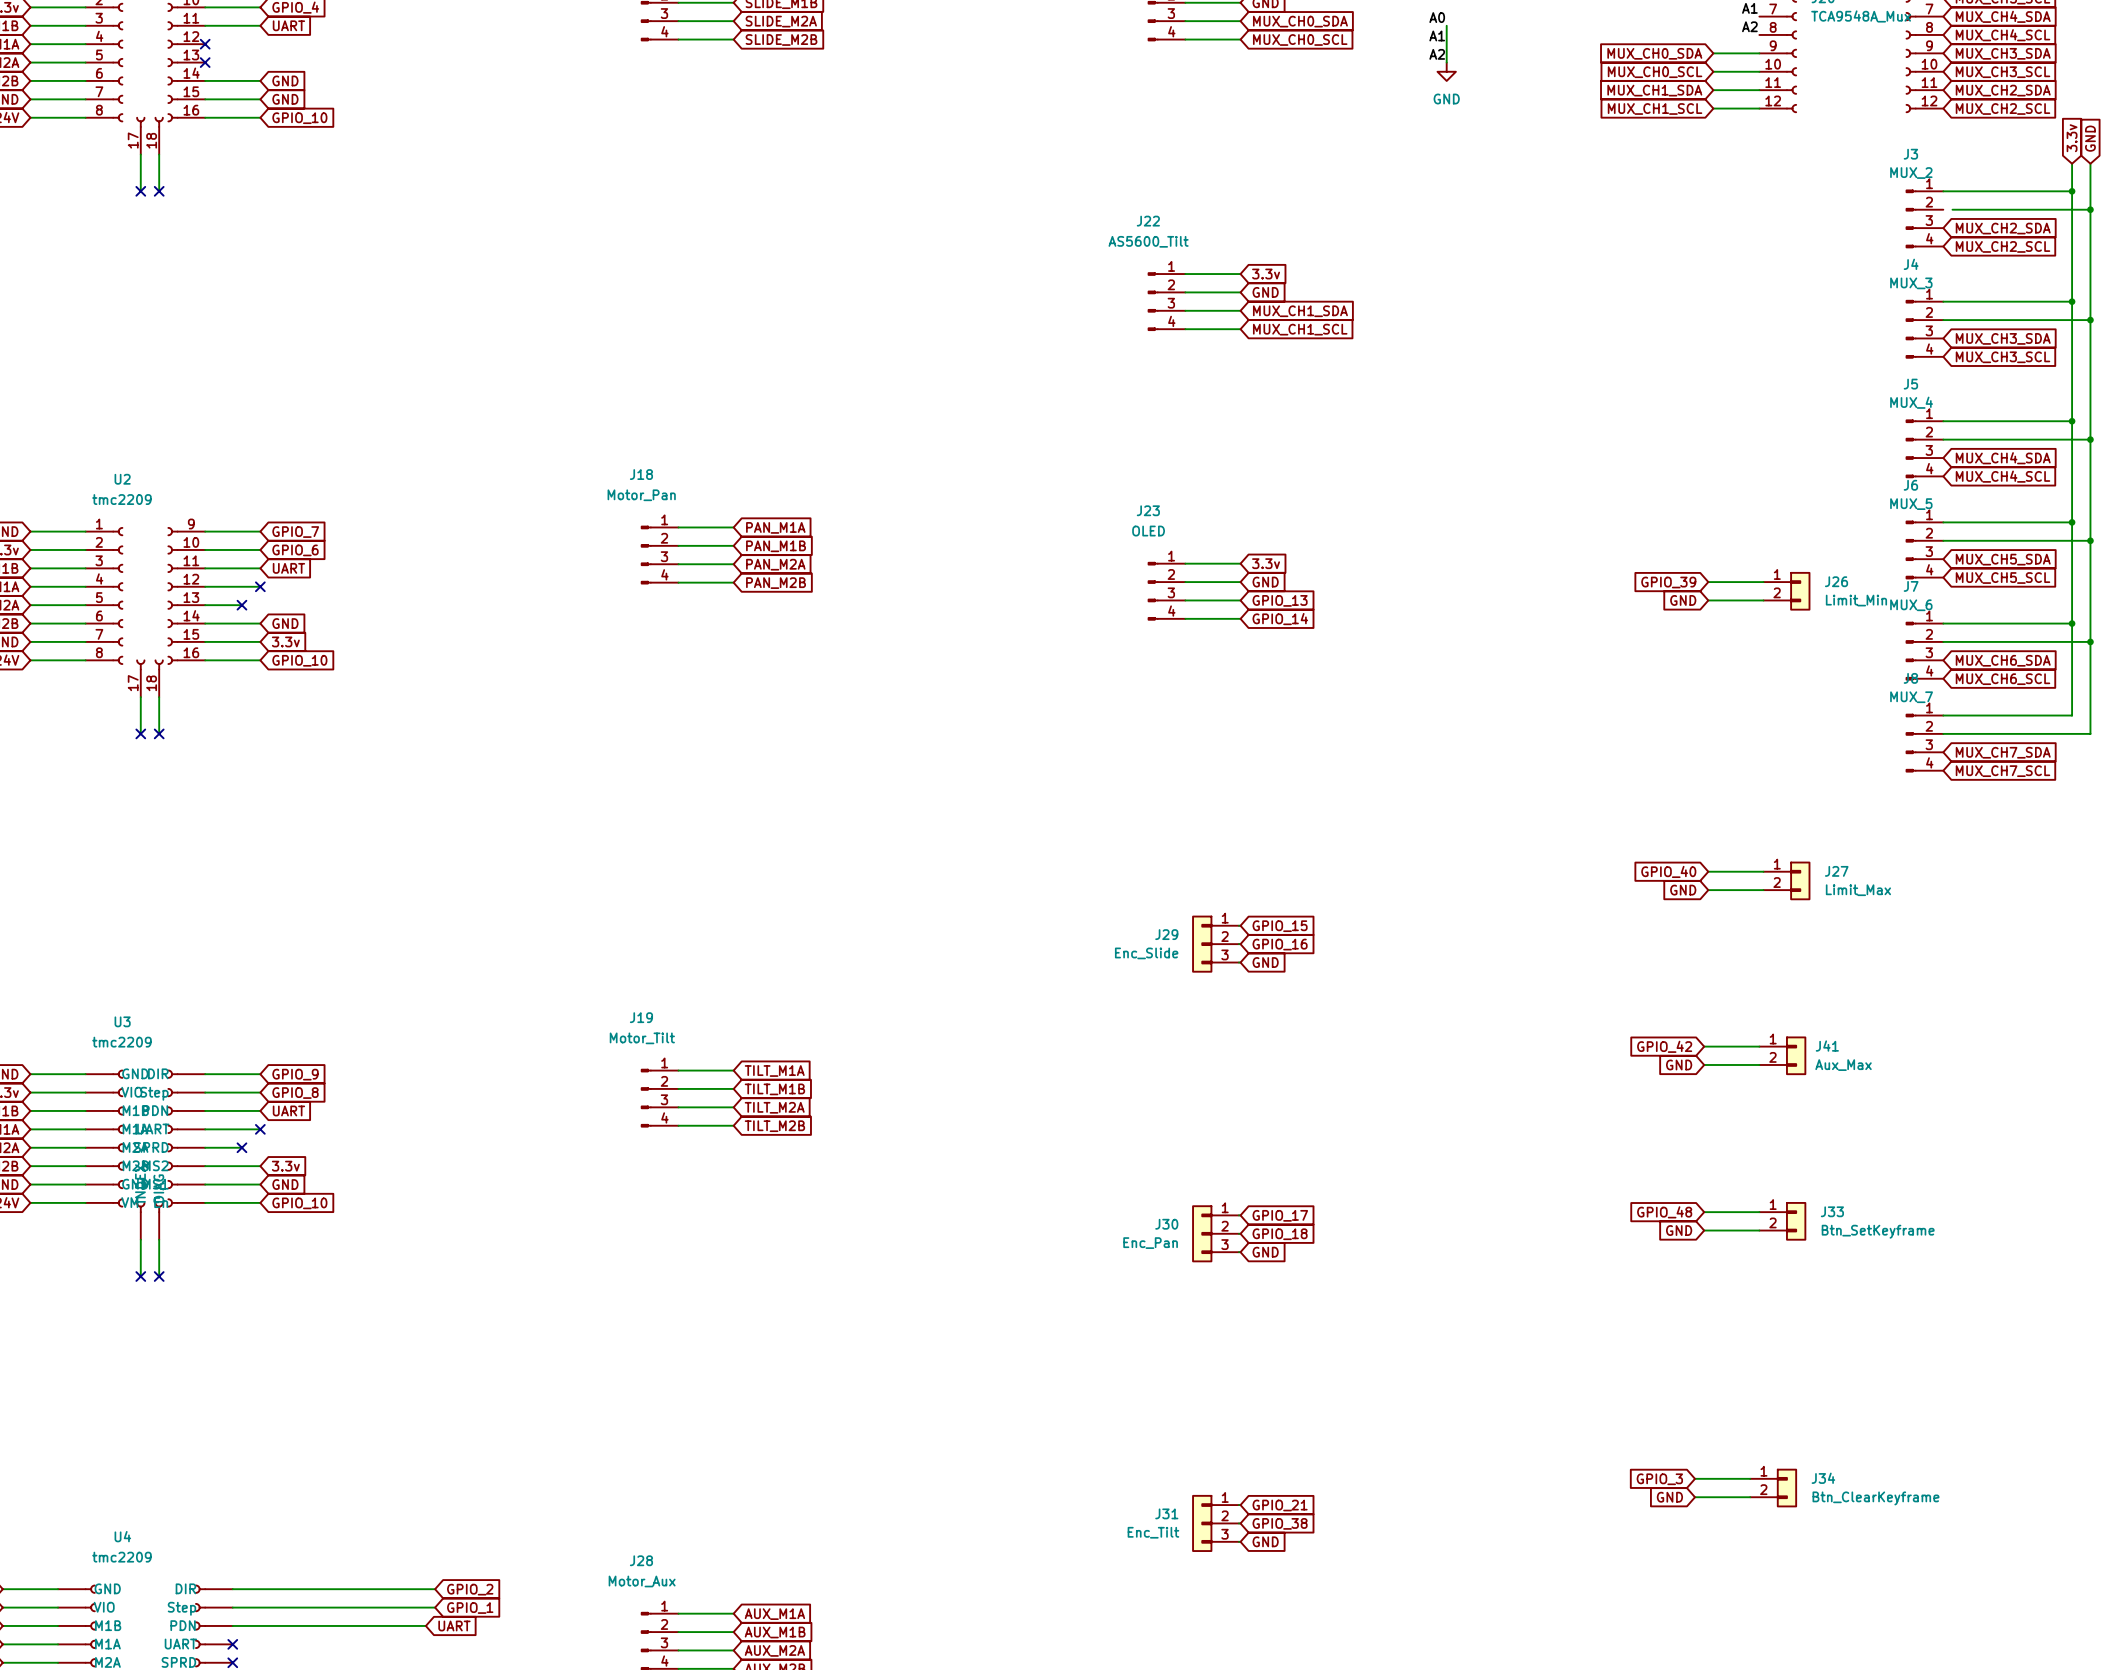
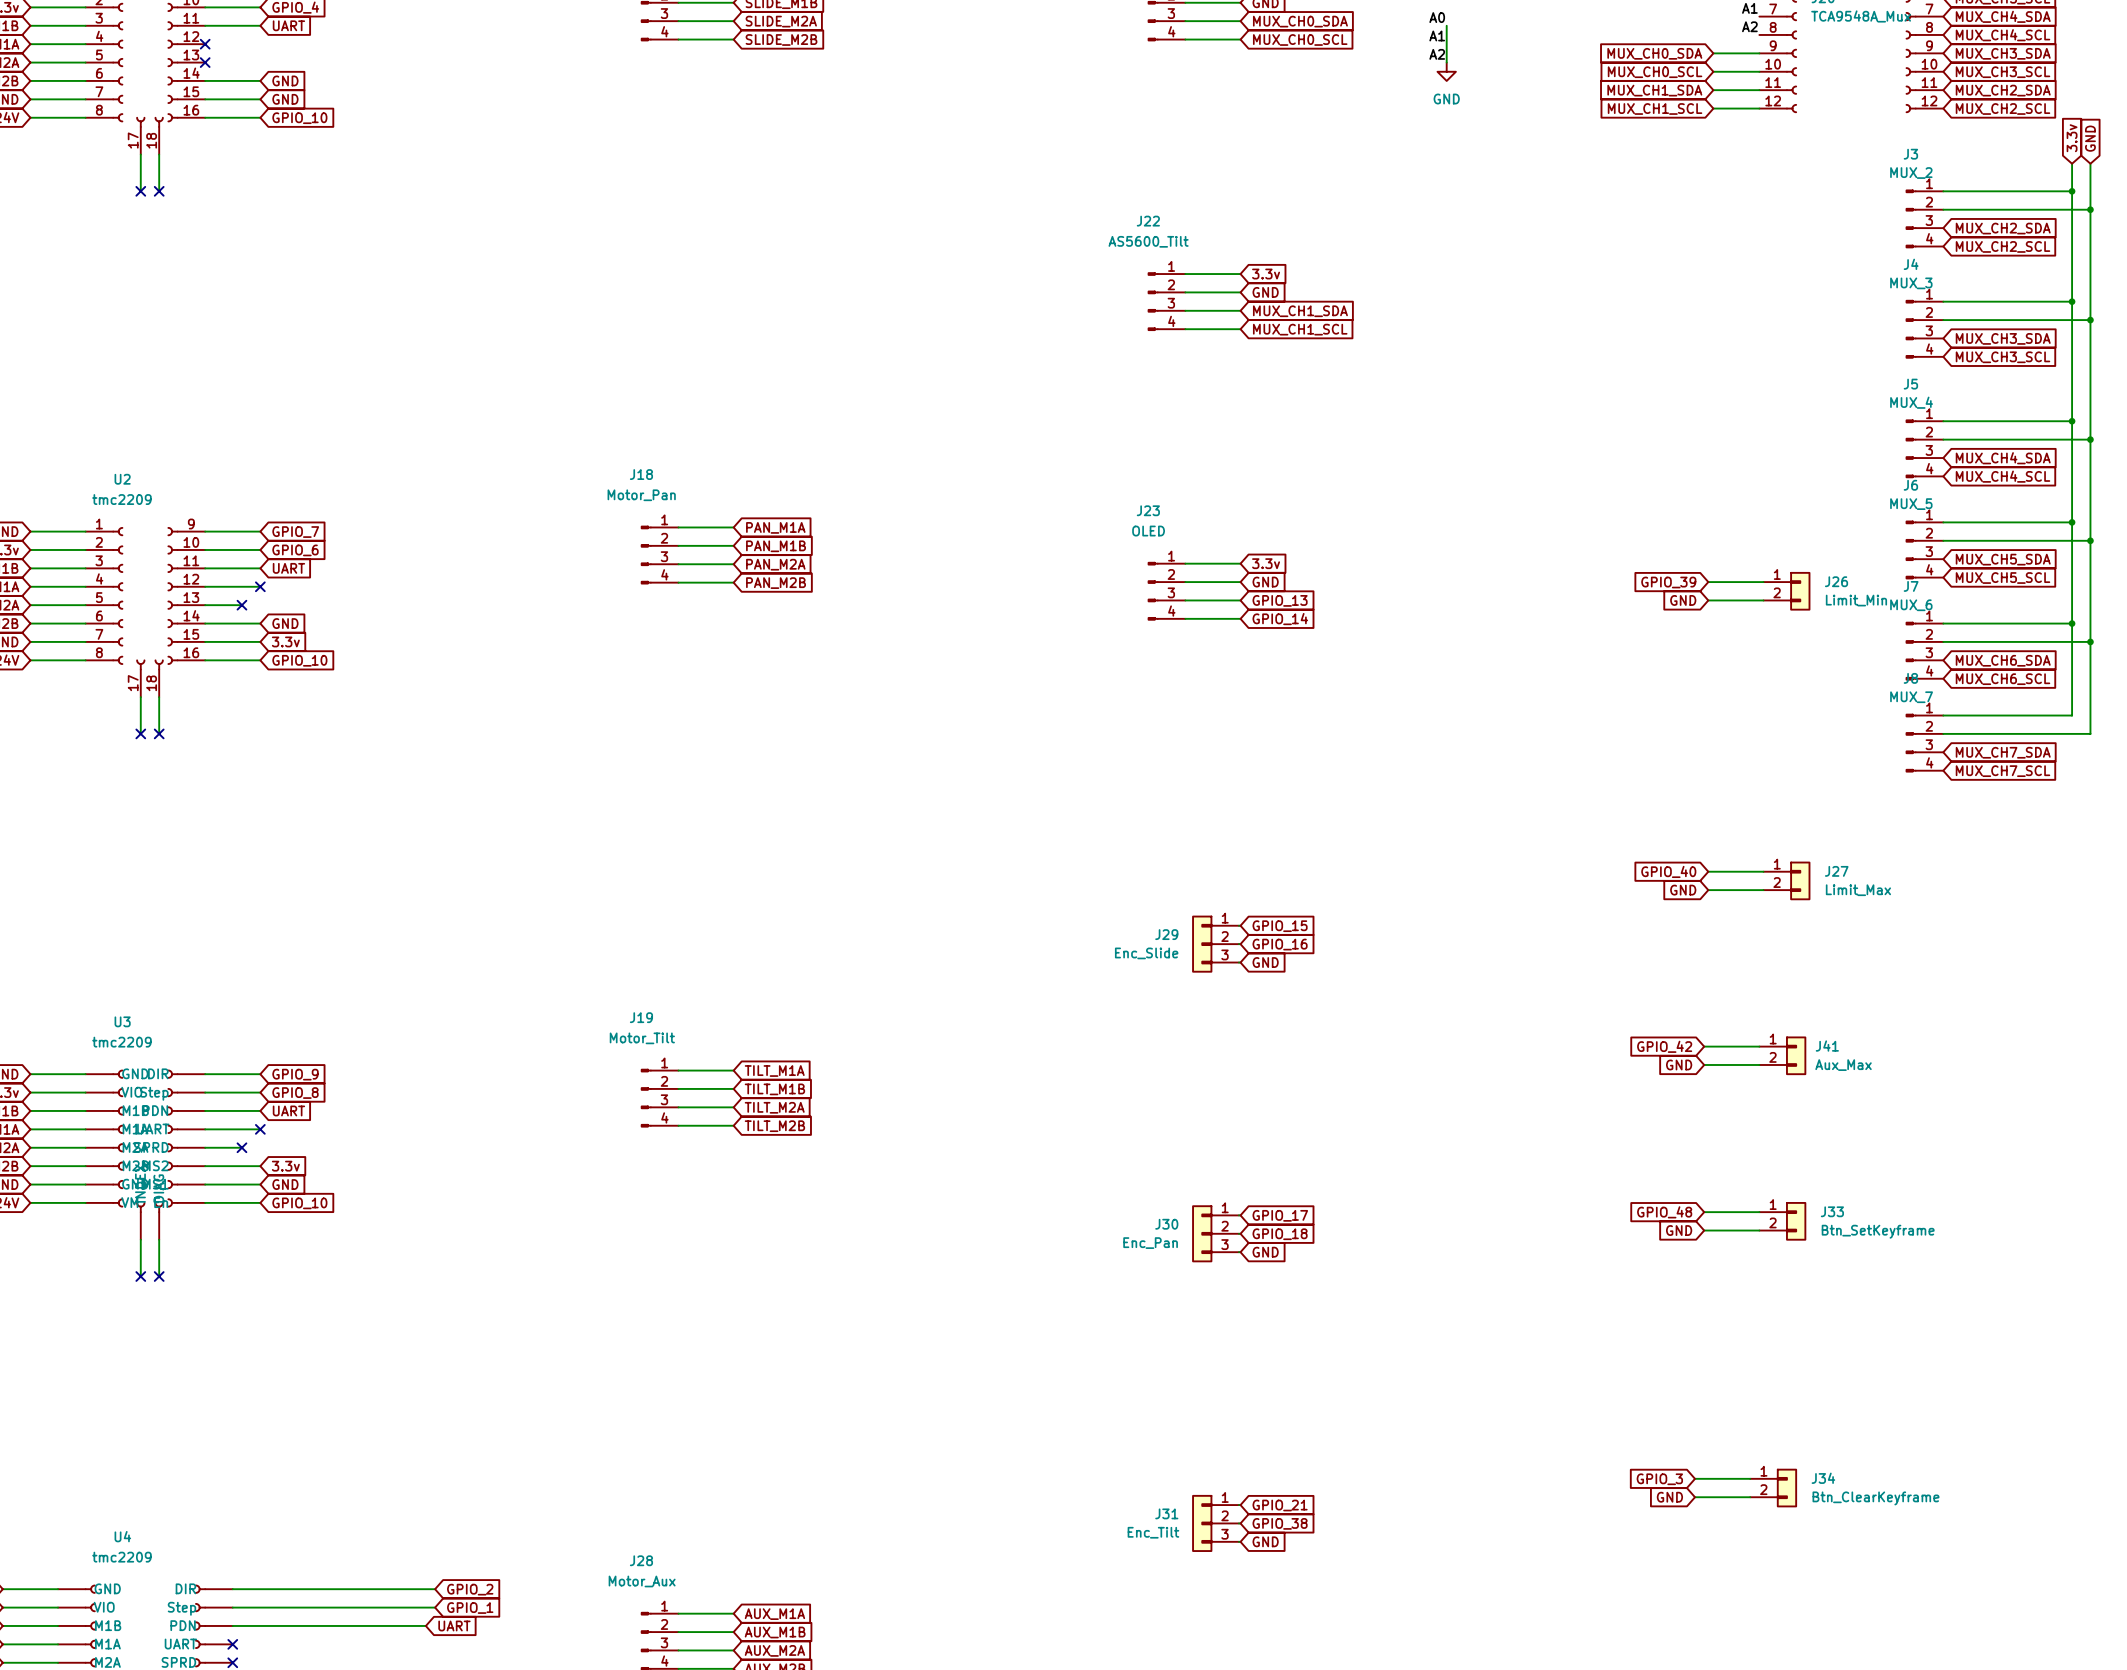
wire: none -> (1943, 209) (1952, 209)

